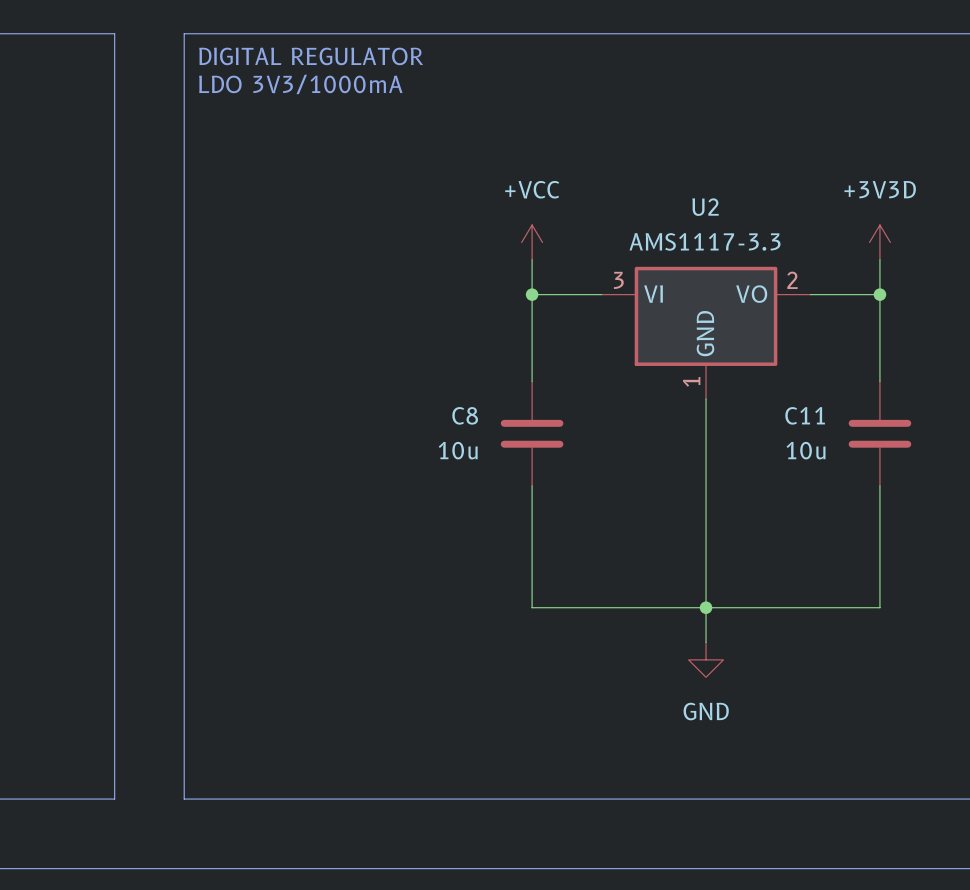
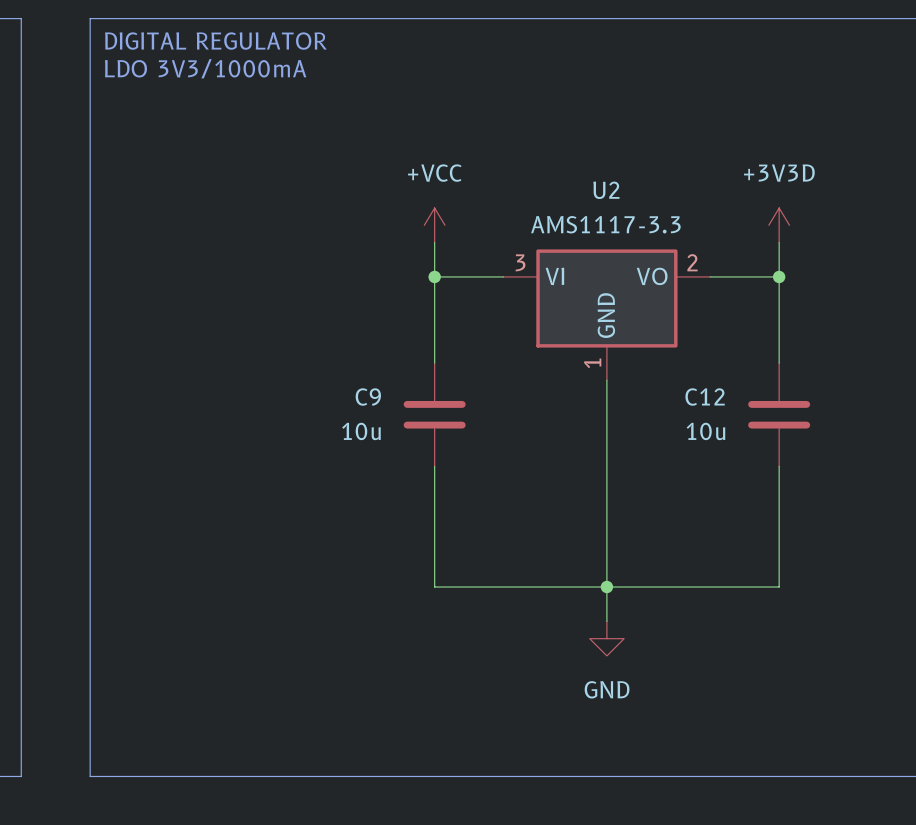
C8 name: C8 (465, 415) -> C9 (368, 397)
C11 name: C11 (805, 415) -> C12 (705, 396)

